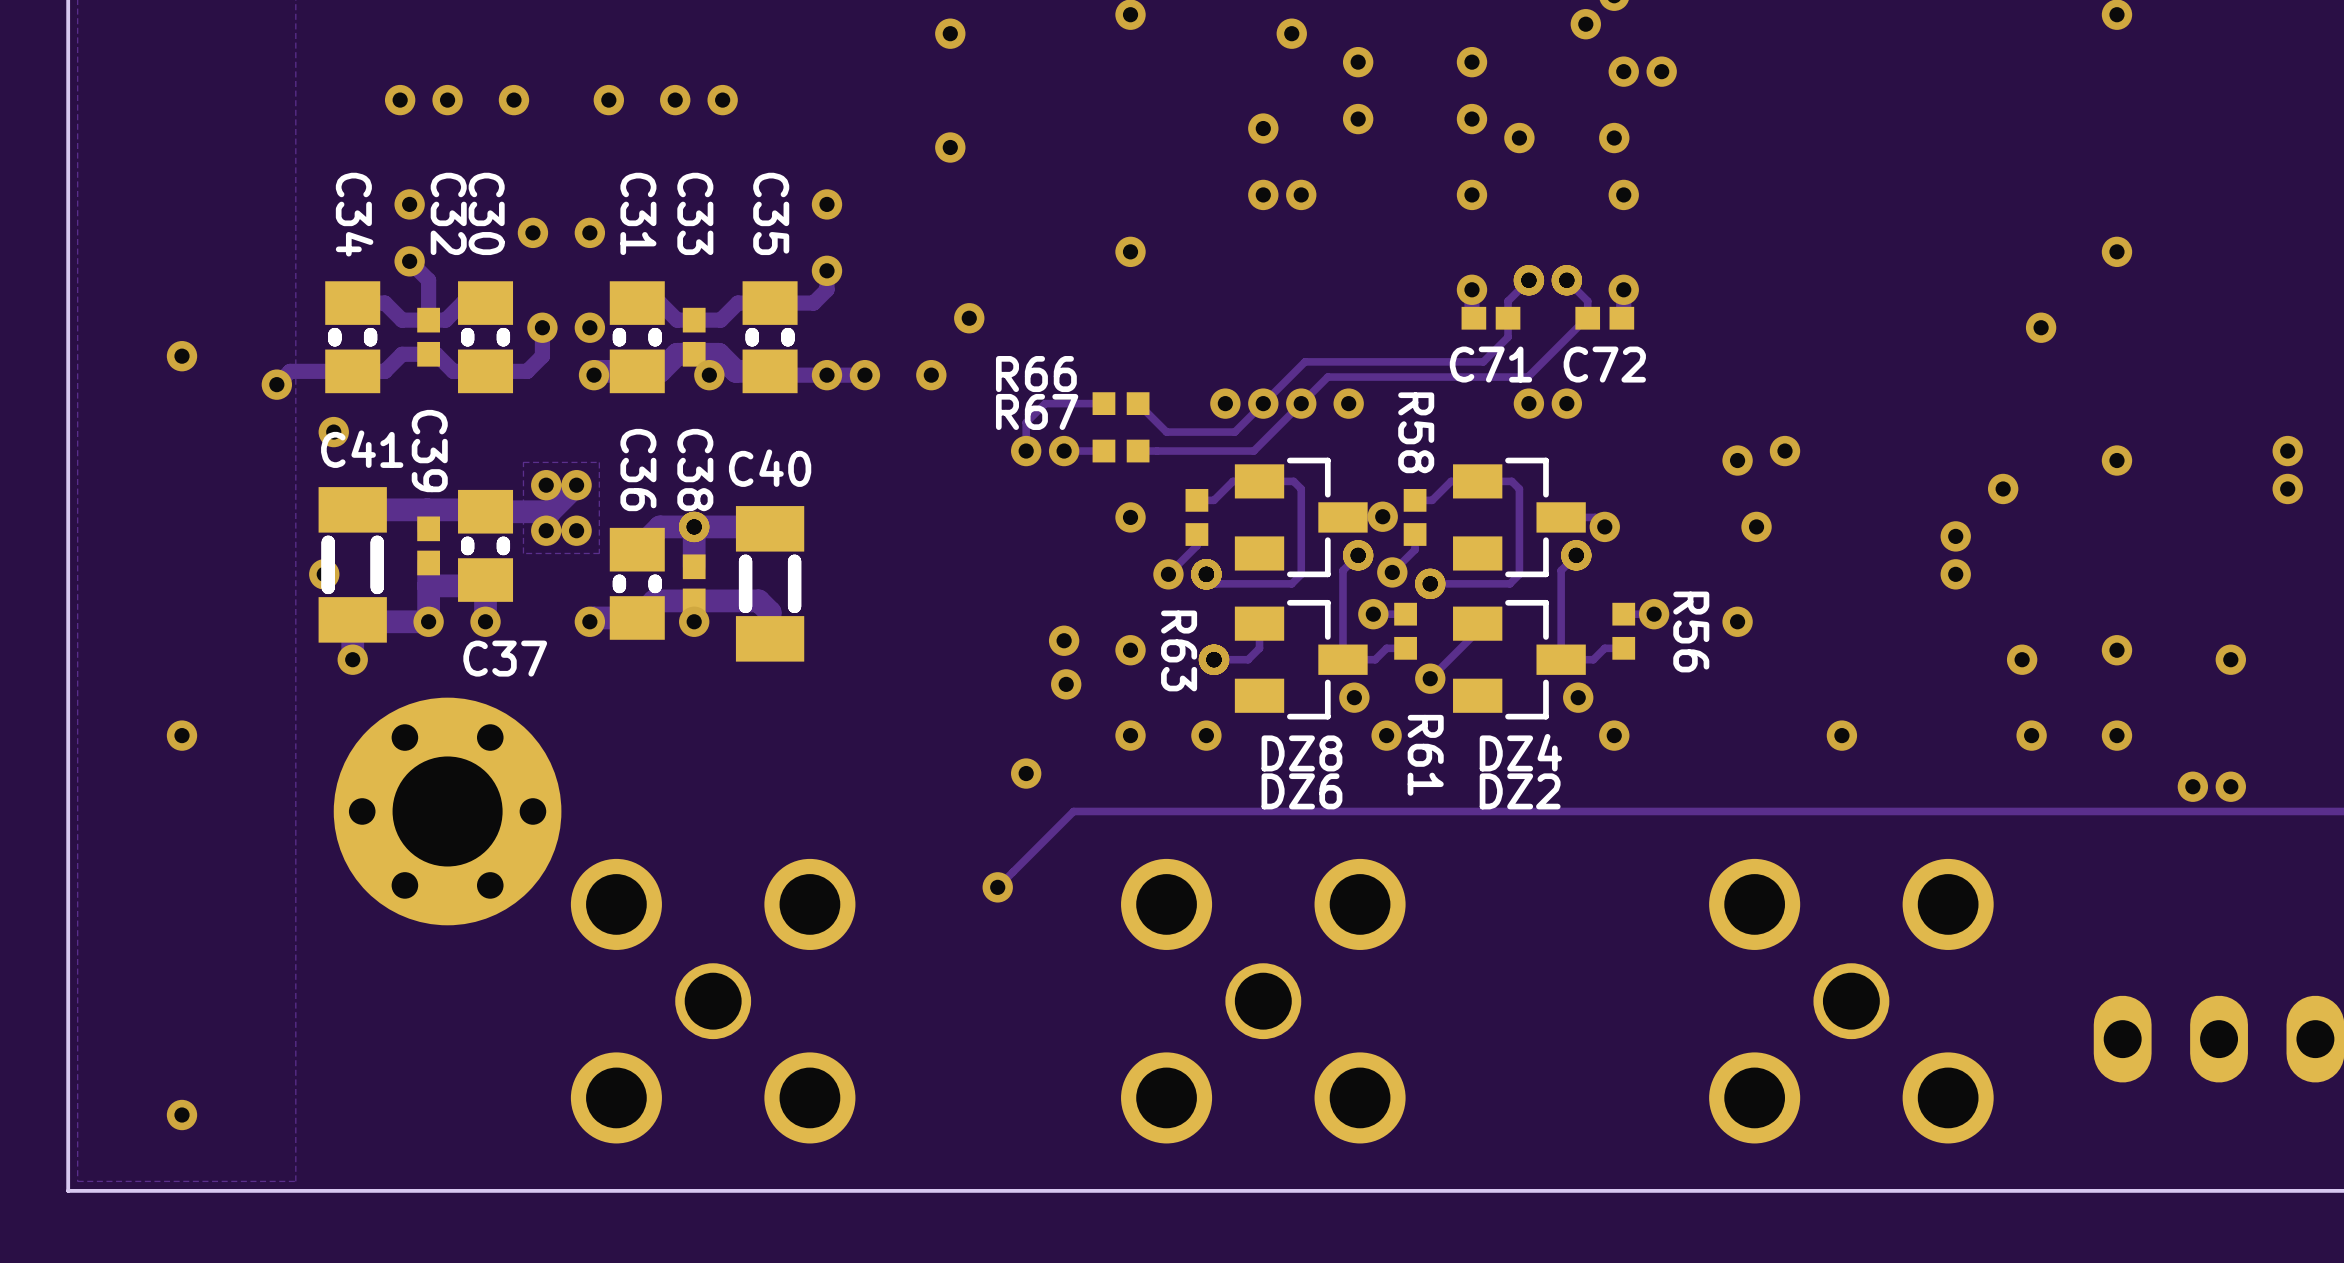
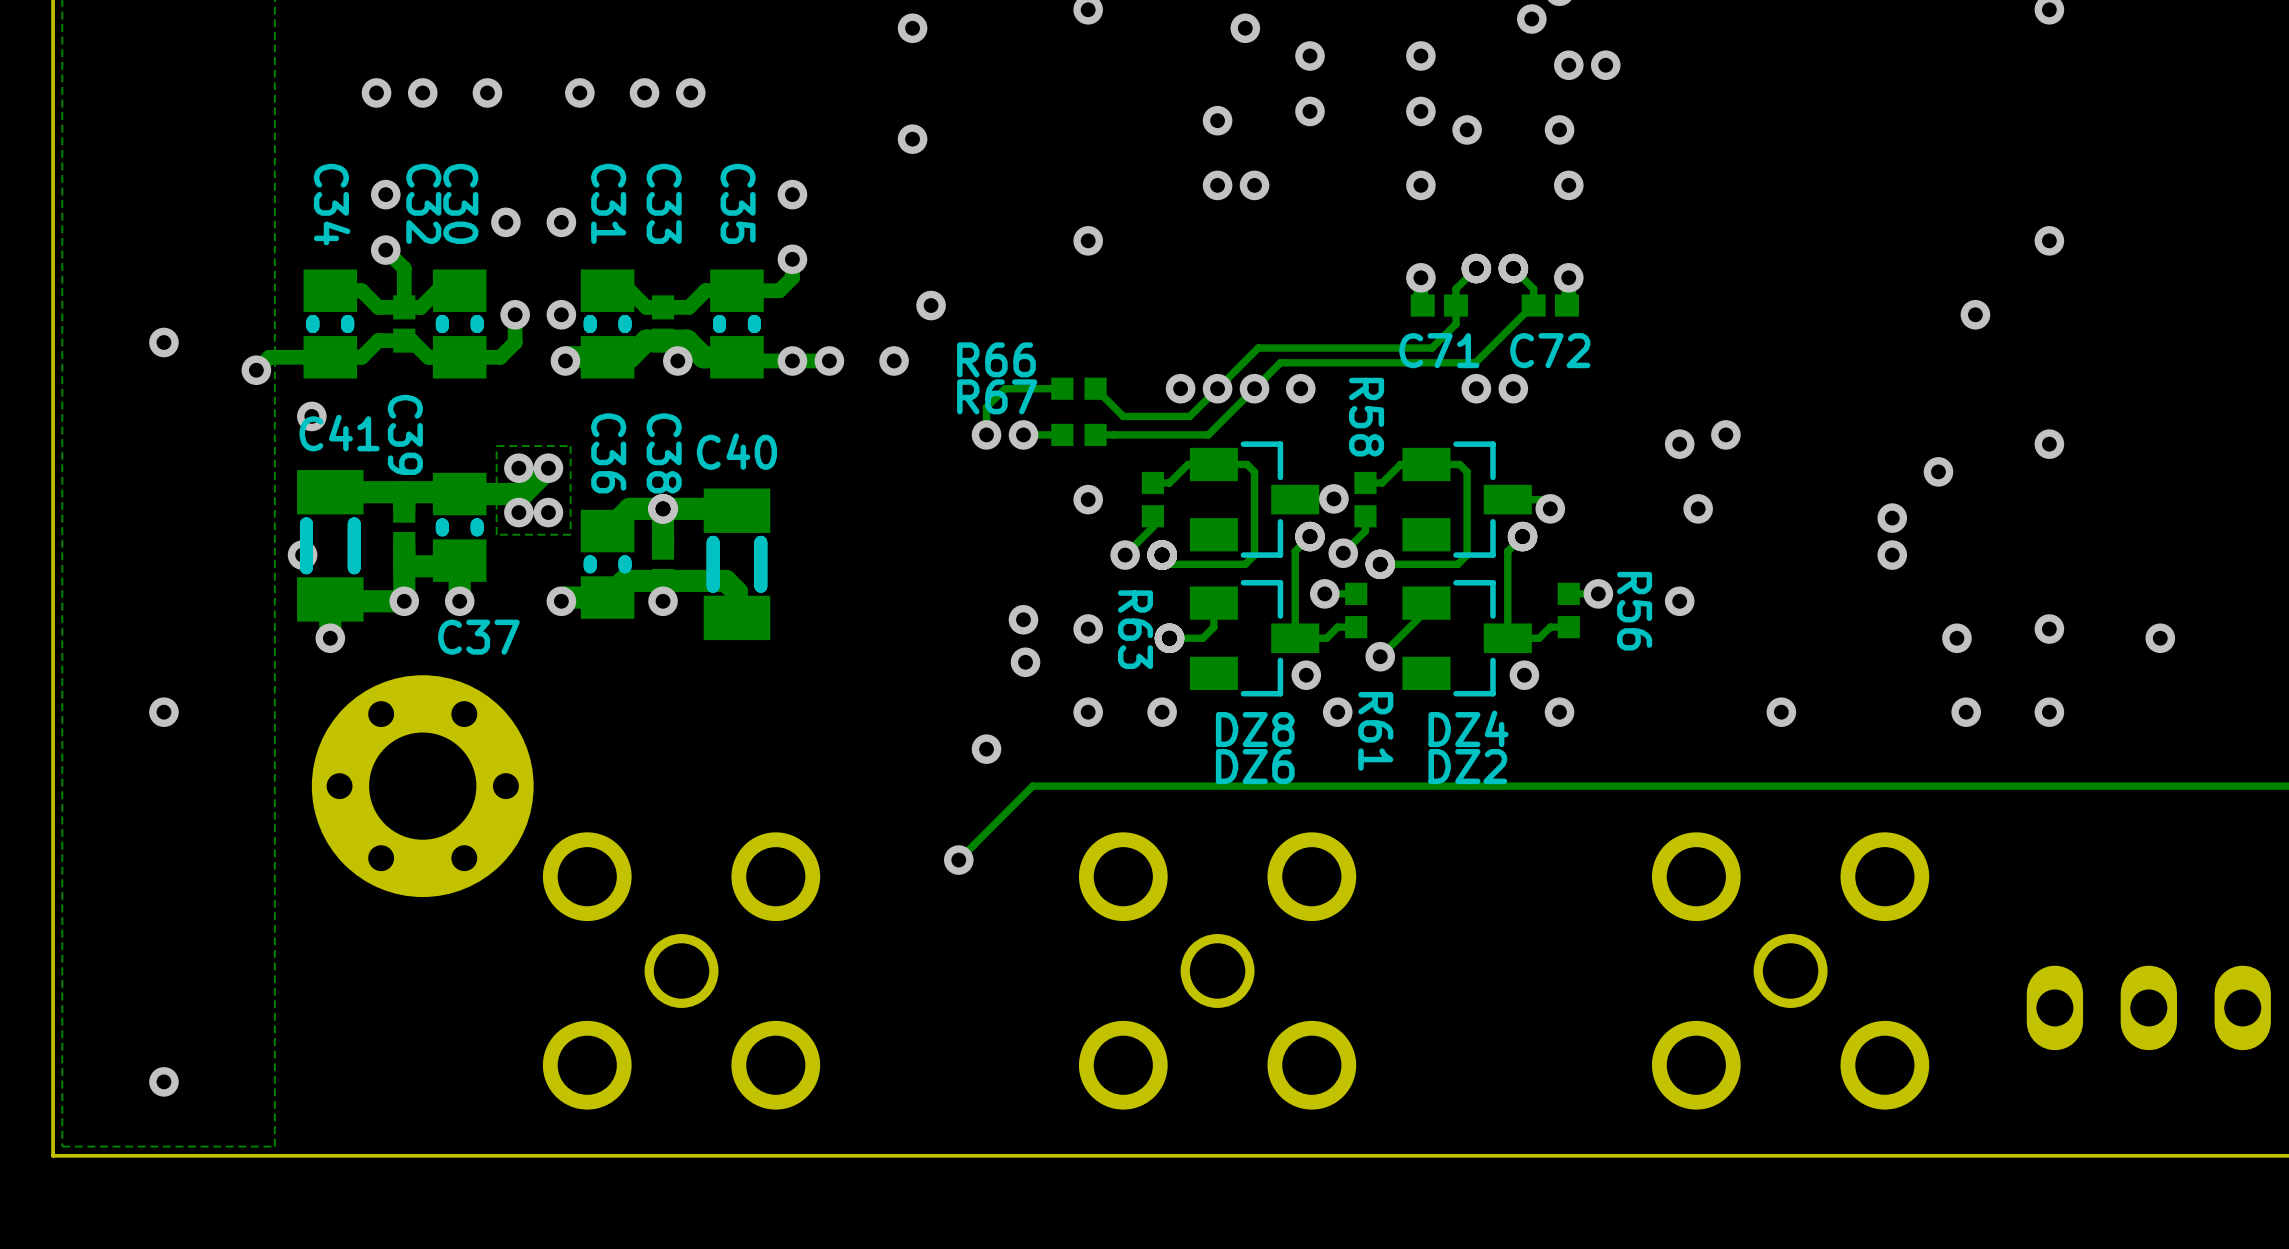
via: (2287, 451) -> none
via: (2287, 488) -> none
via: (2192, 786) -> none
via: (2230, 786) -> none

